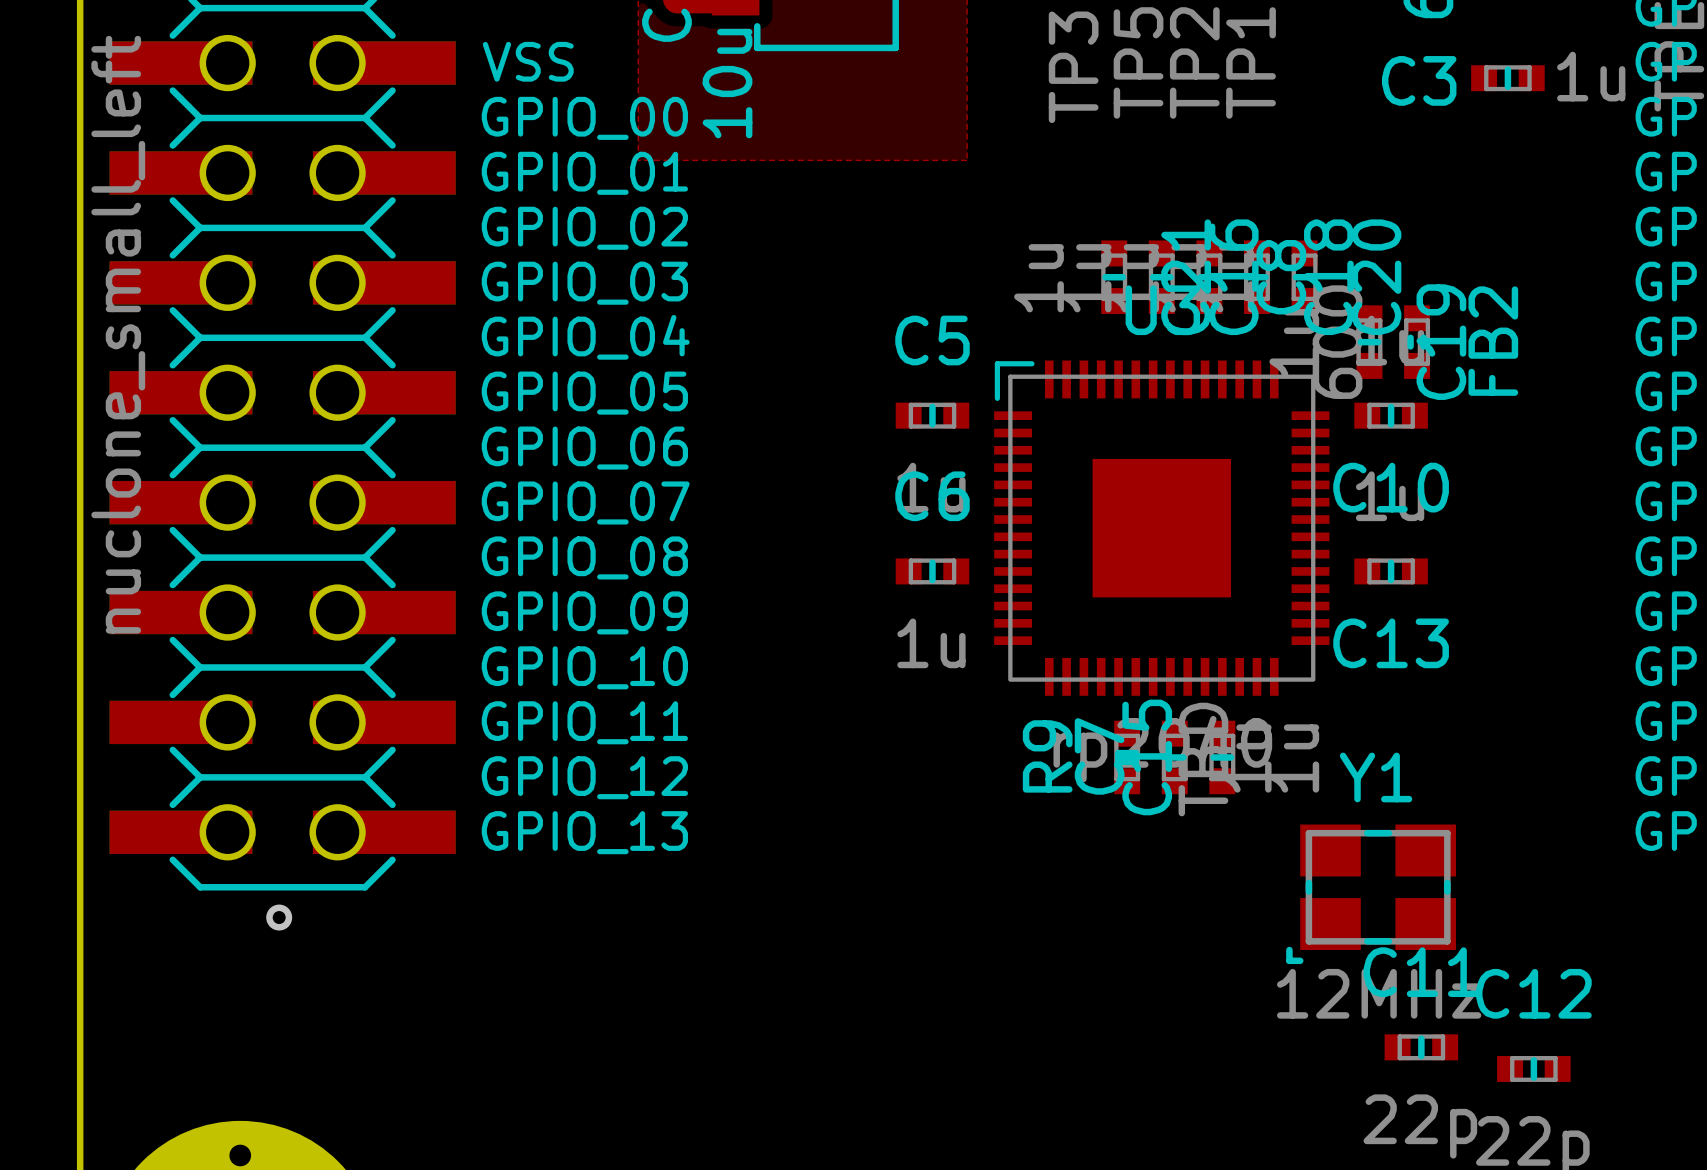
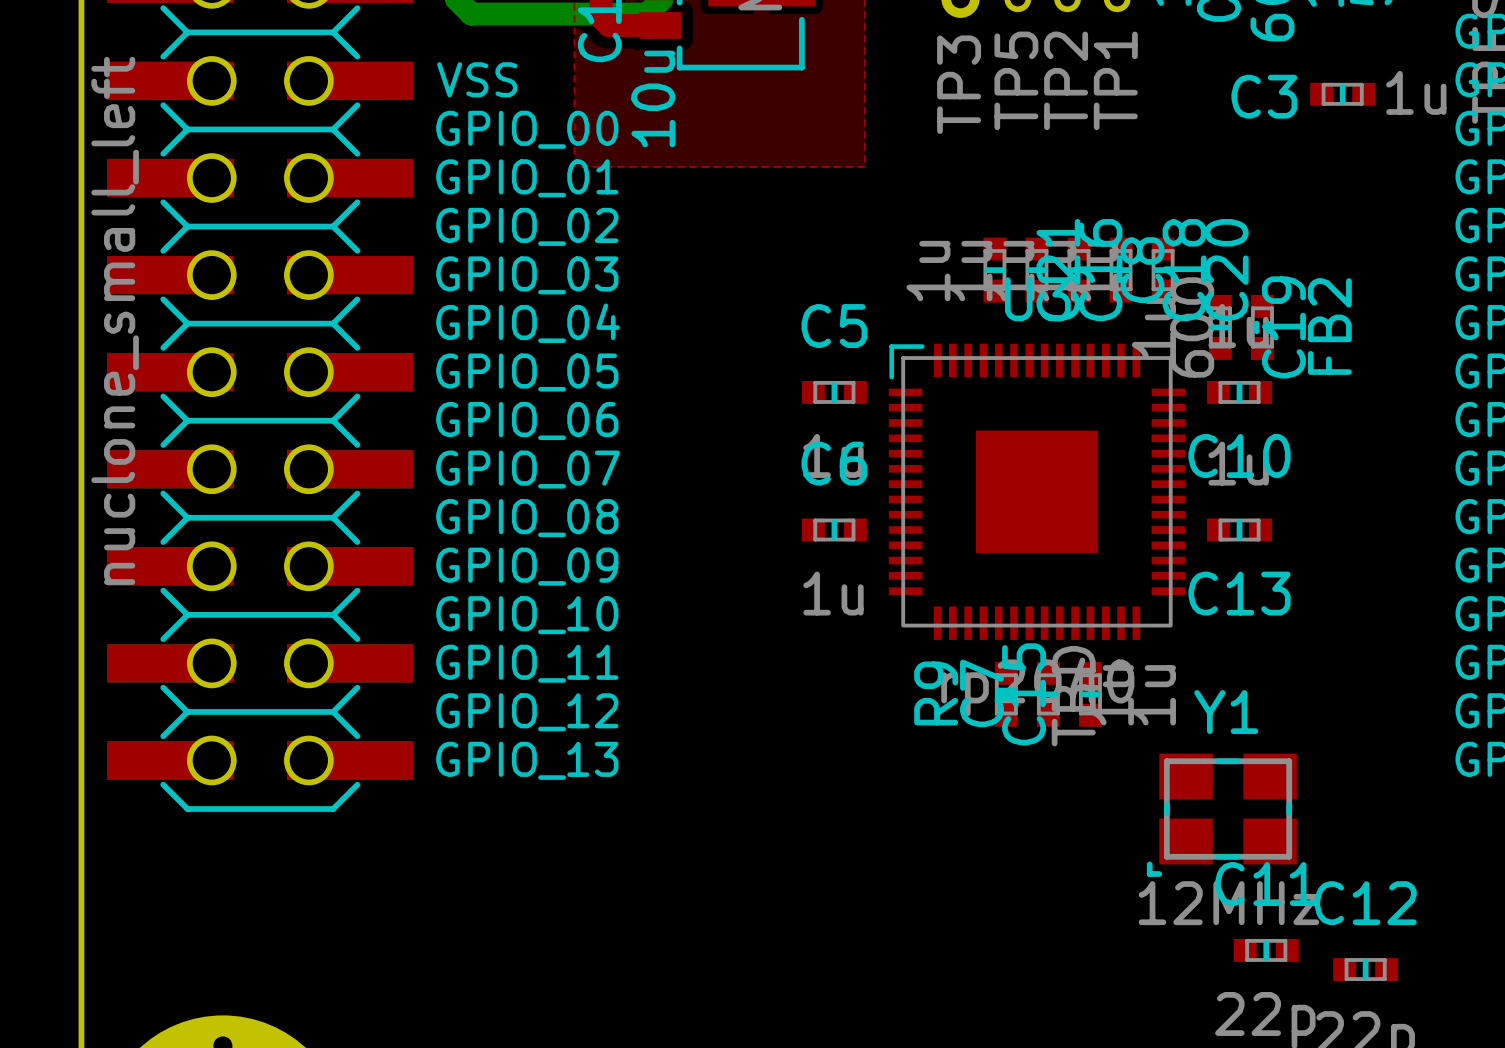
via: (279, 917) -> none

